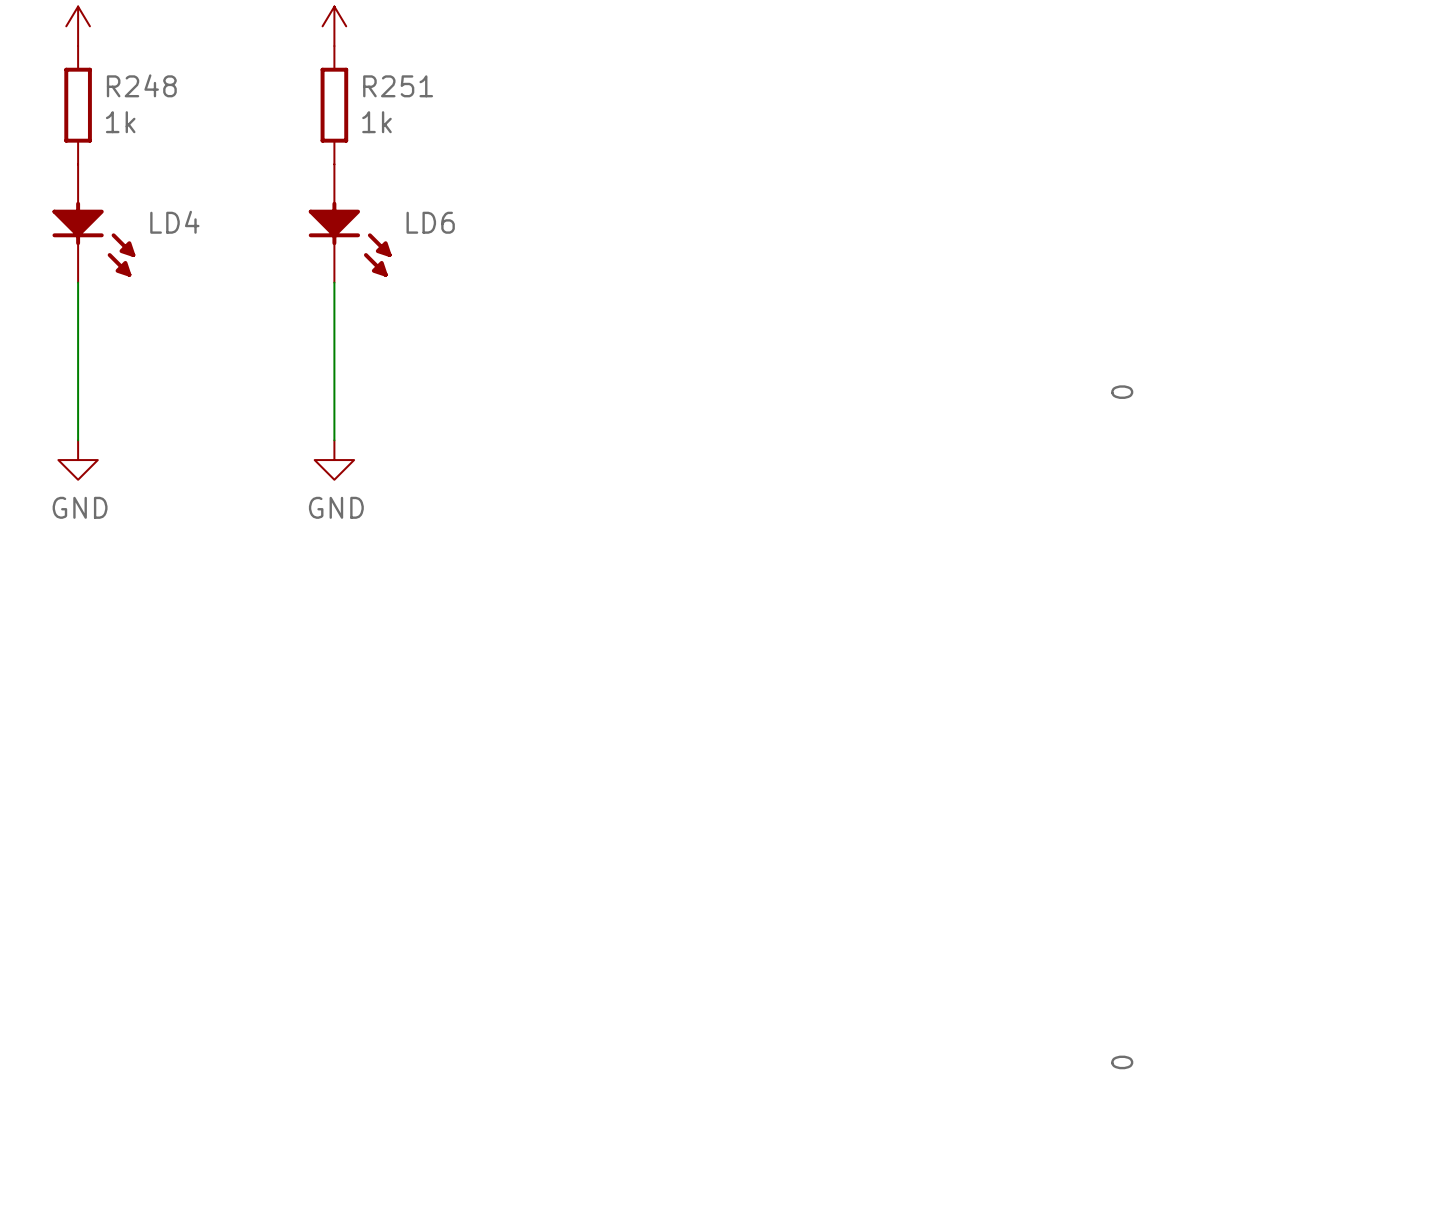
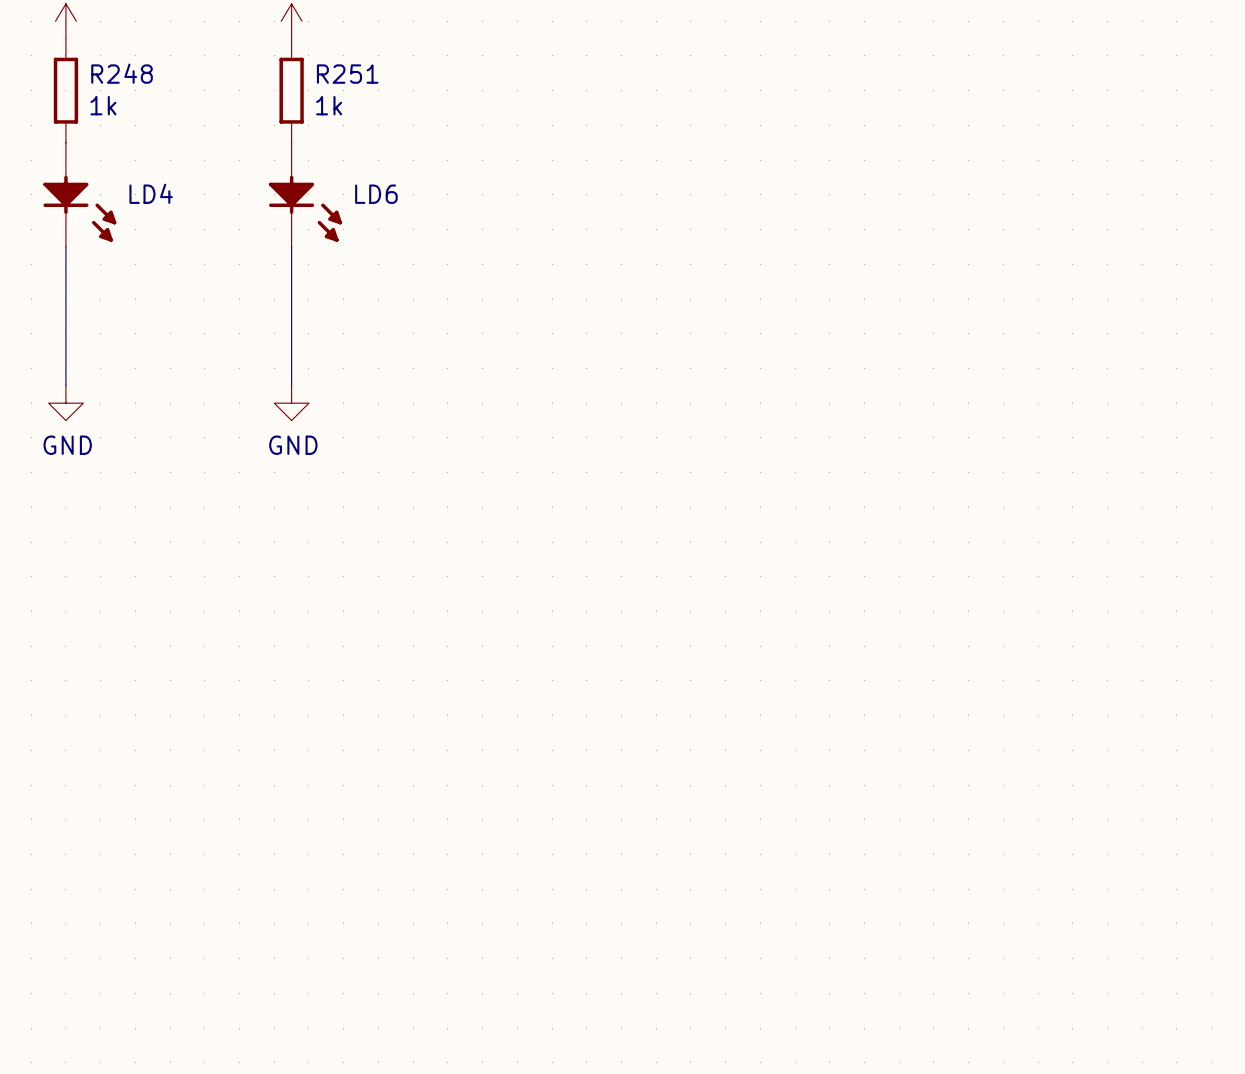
part text: 0 (1122, 392) -> none
part text: 0 (1122, 1062) -> none

